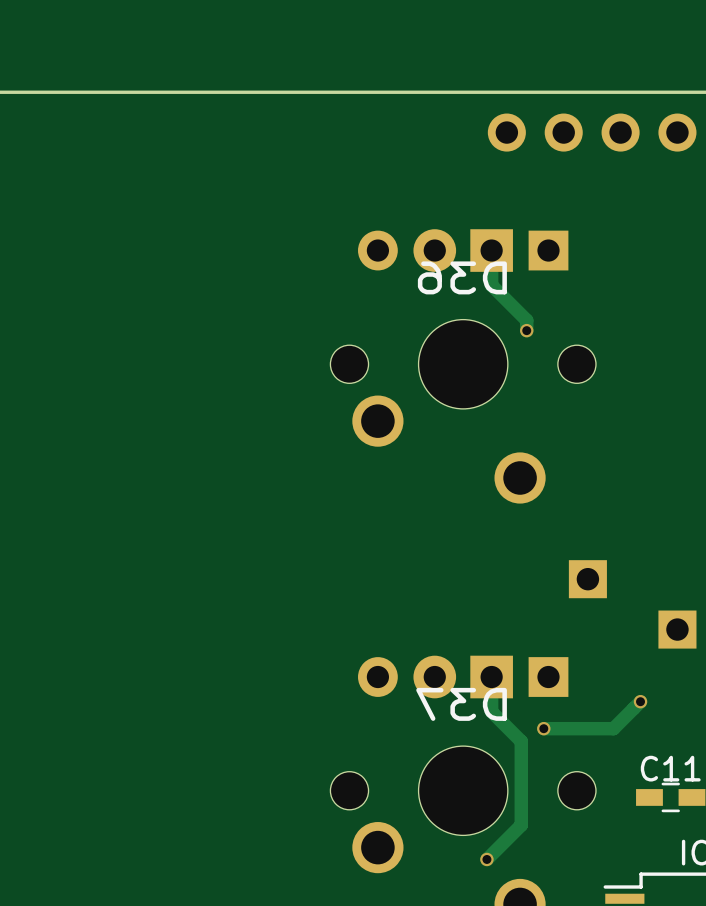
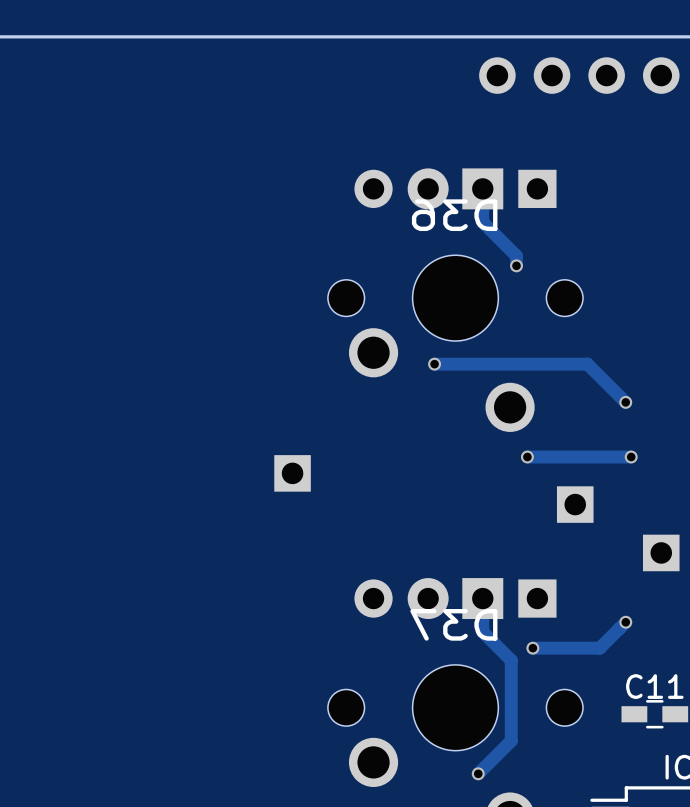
track: none -> (434, 364) (587, 364) (625, 402)
via: none -> (434, 364)
via: none -> (625, 402)
via: none -> (527, 457)
track: none -> (631, 457) (527, 457)
via: none -> (631, 457)
part: none -> (292, 473)

